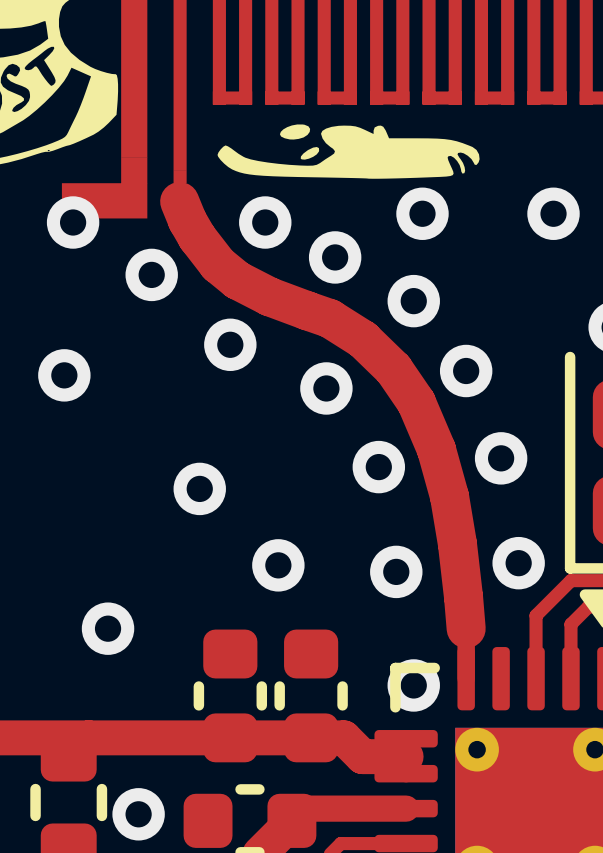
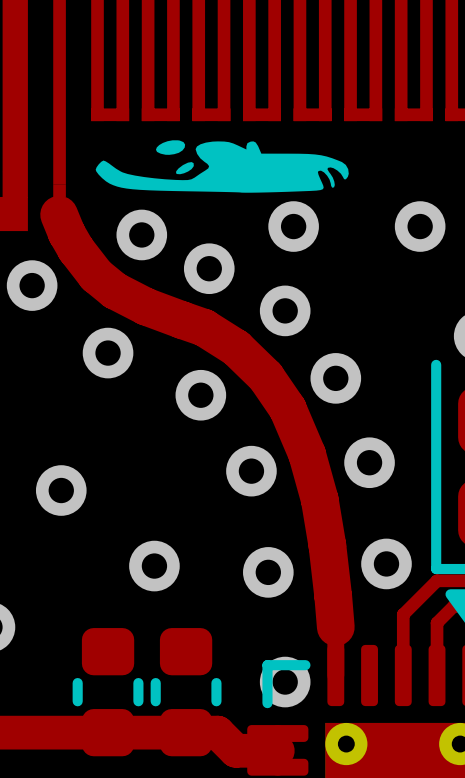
via position: (199, 488) -> (61, 490)

